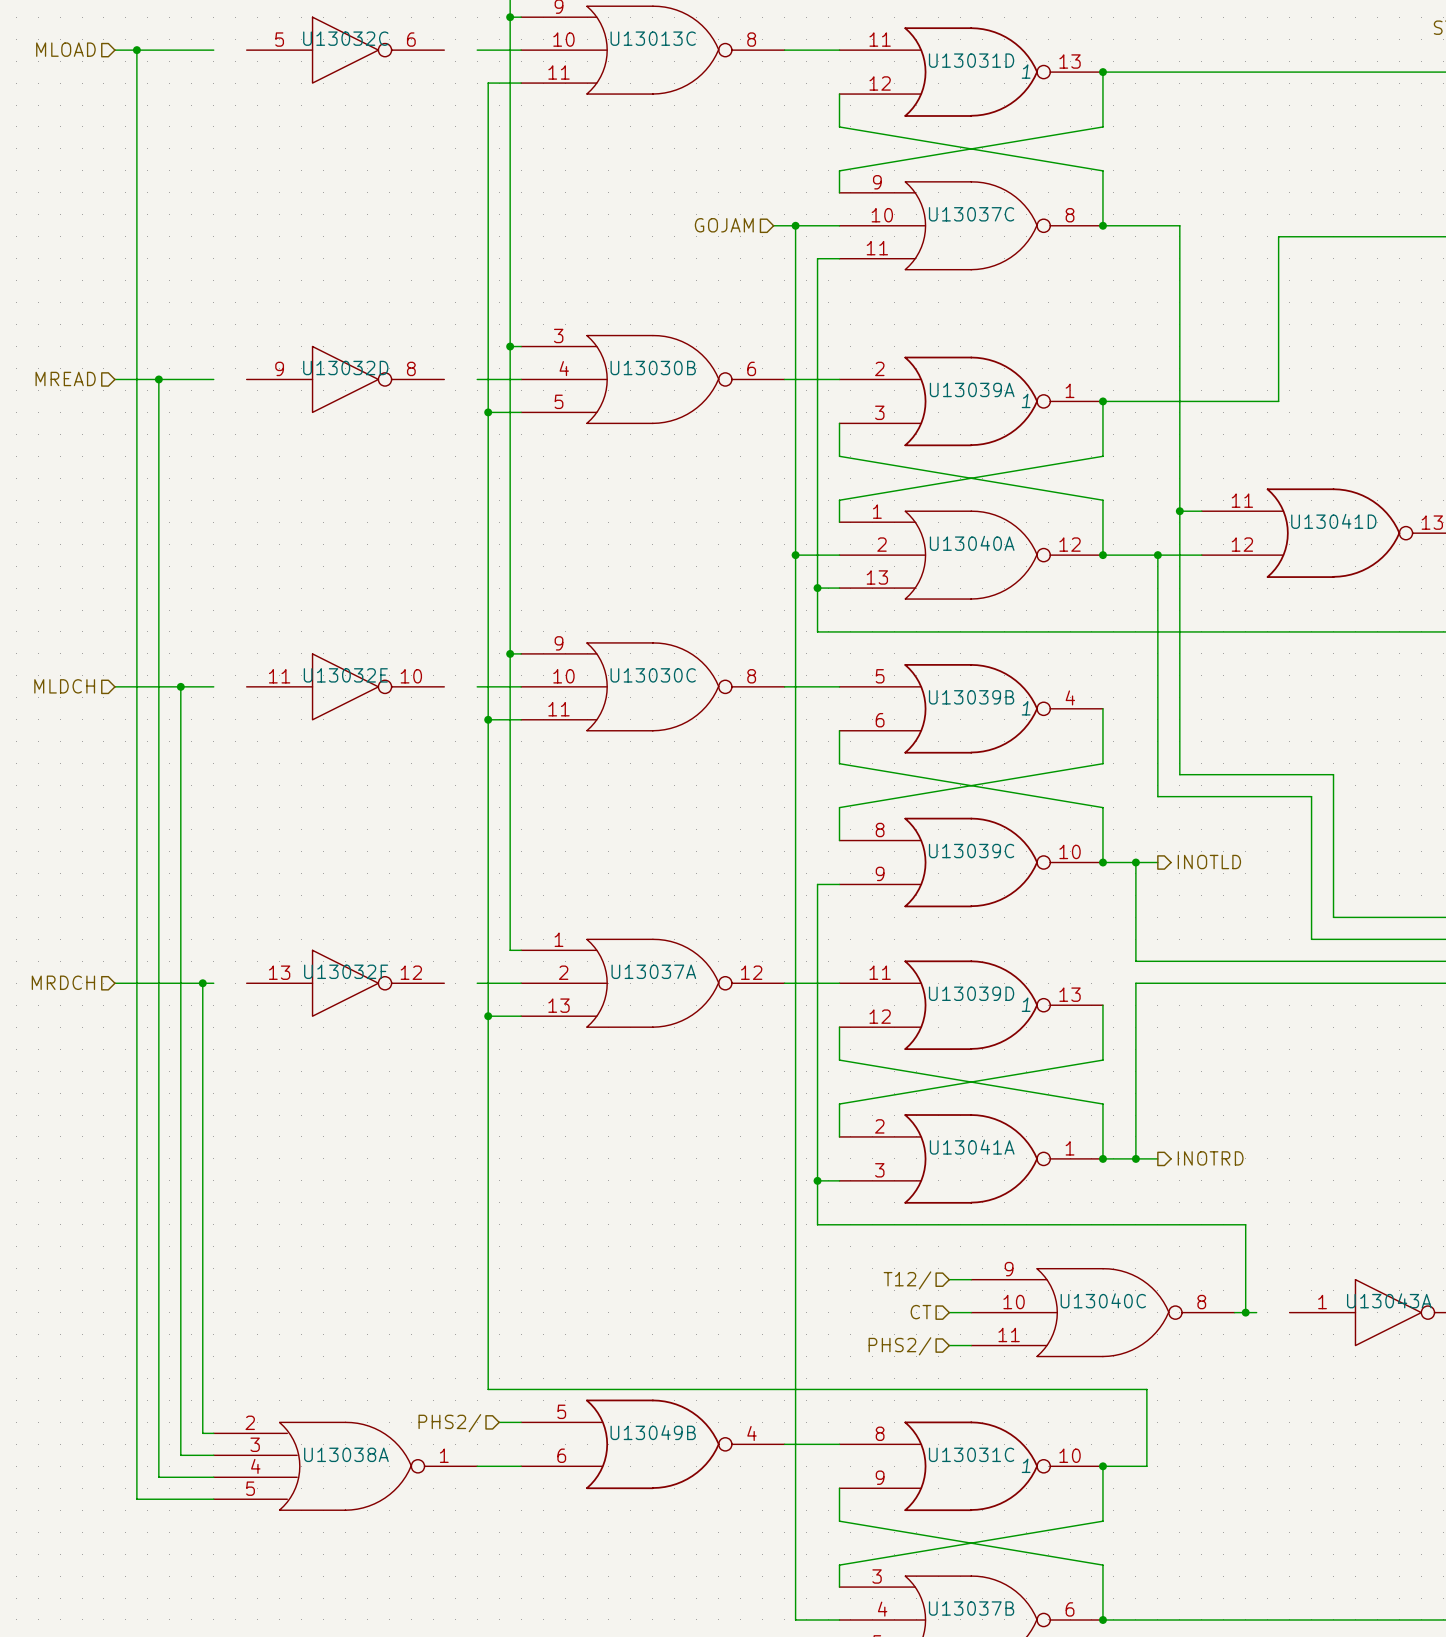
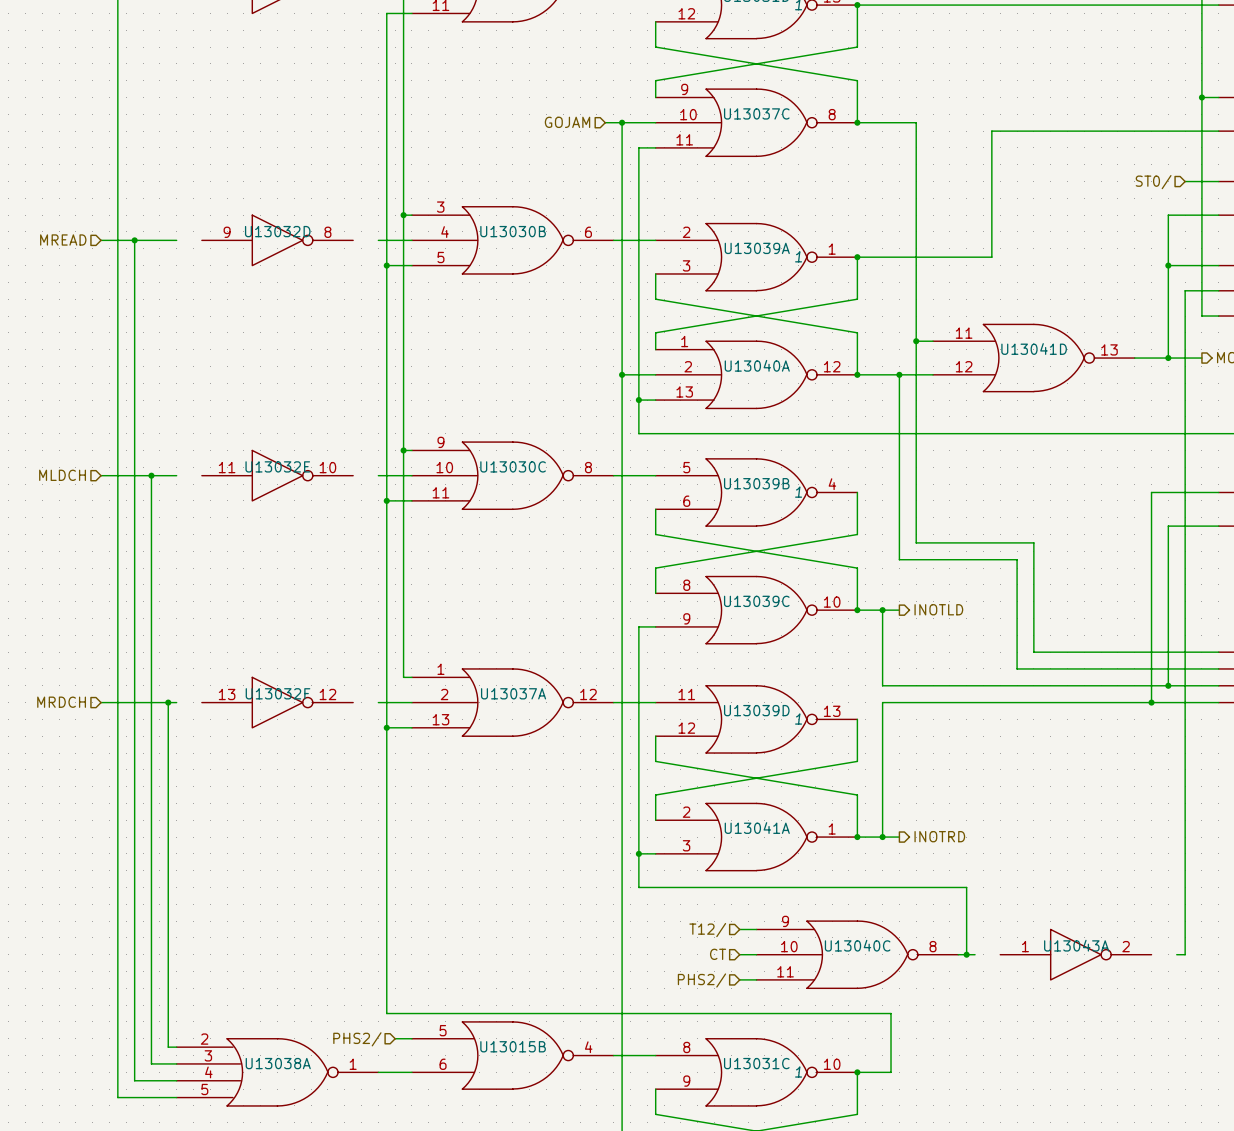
U13049B name: U13049B (653, 1432) -> U13015B (513, 1046)

